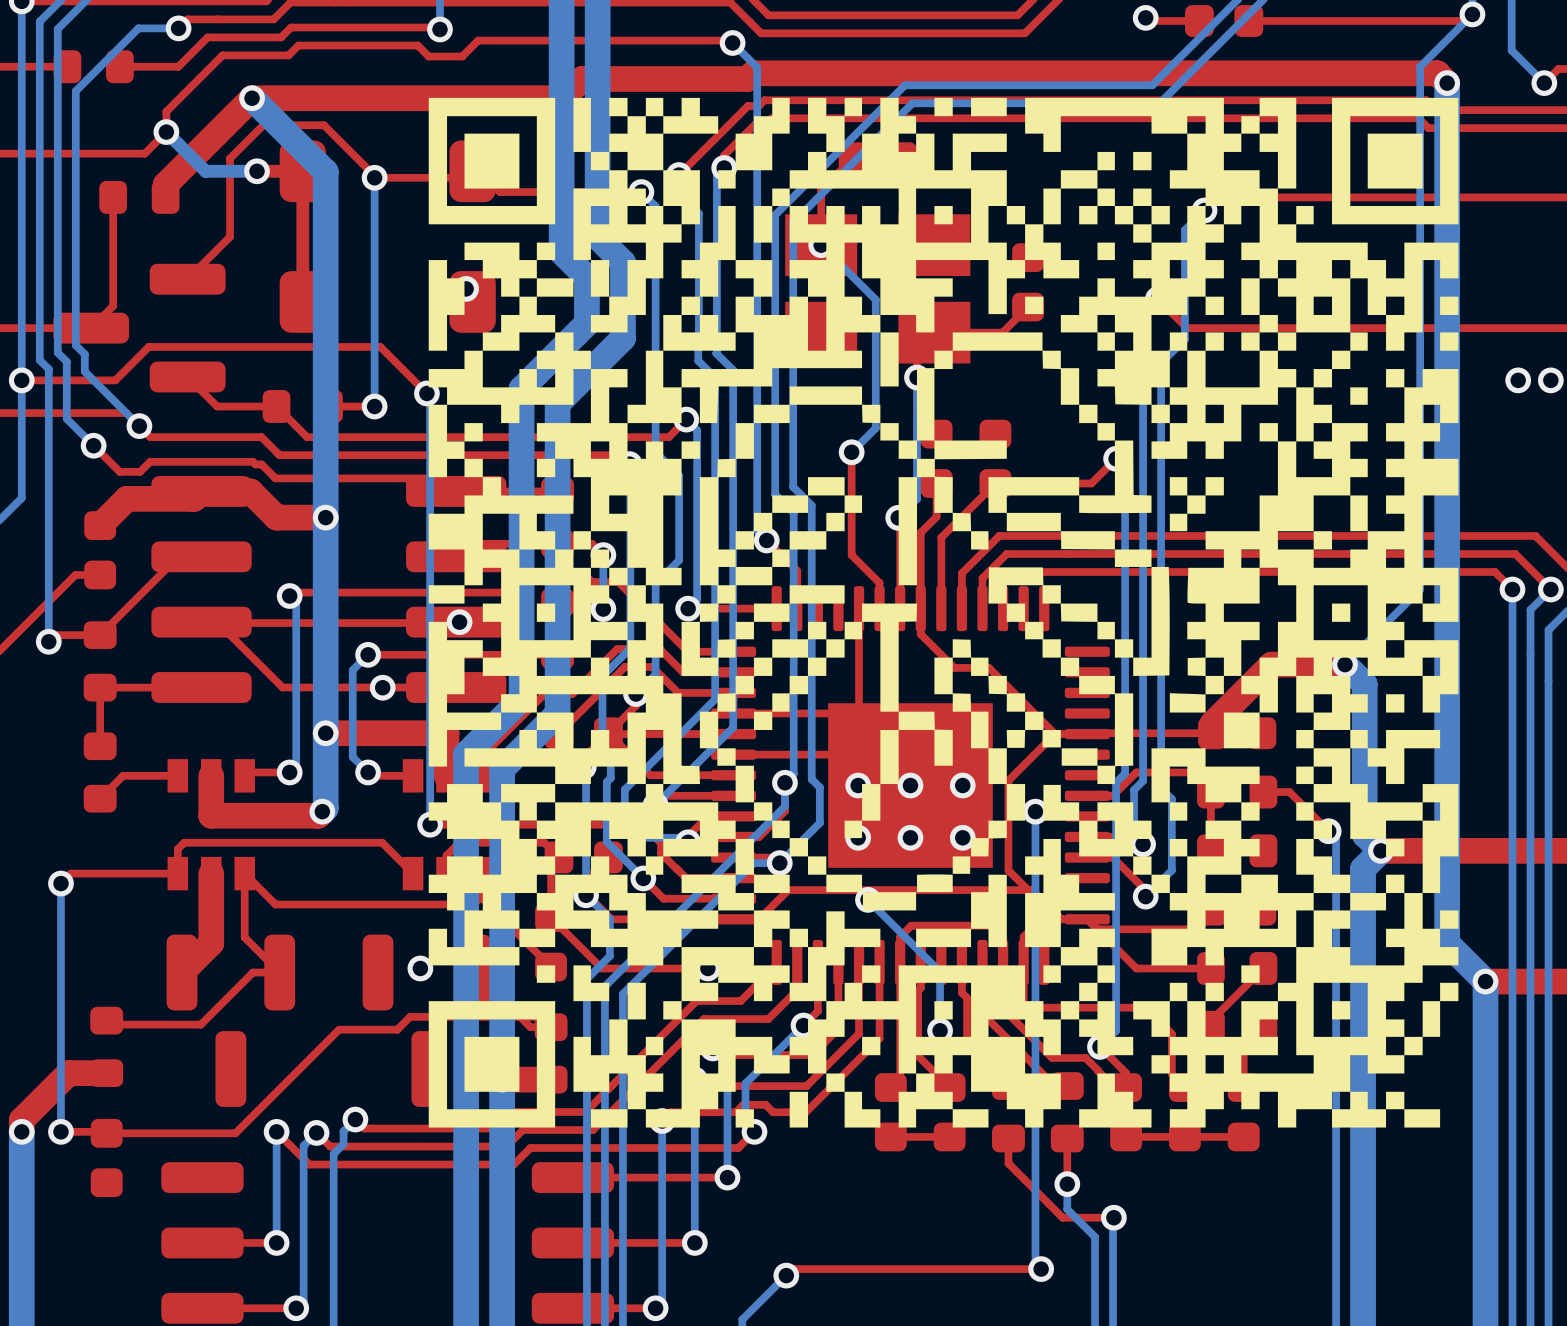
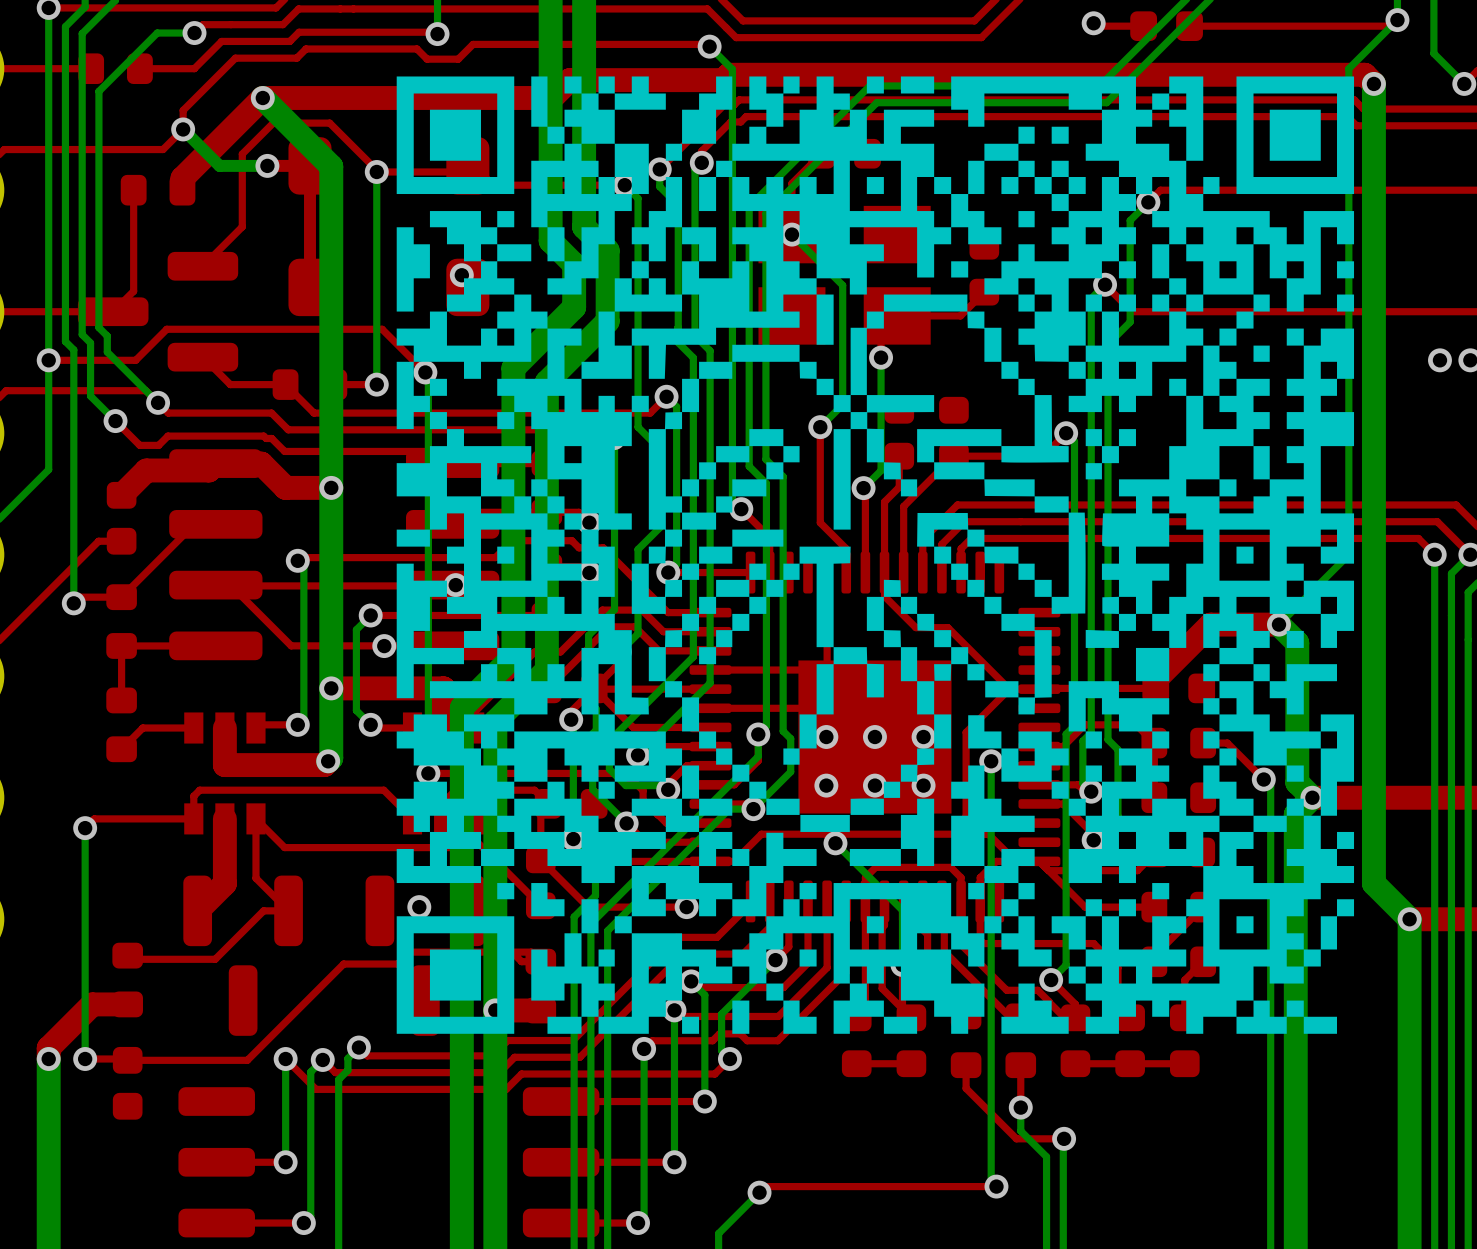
drawing position: (943, 612) -> (875, 555)

